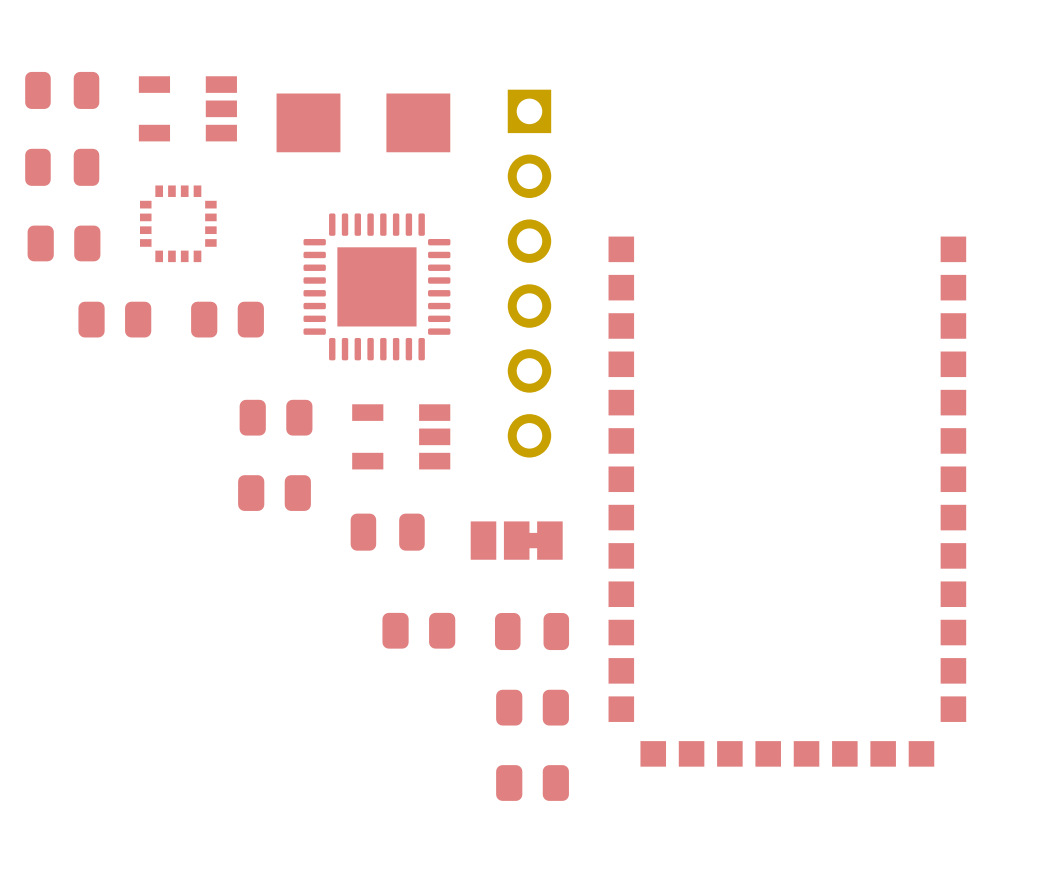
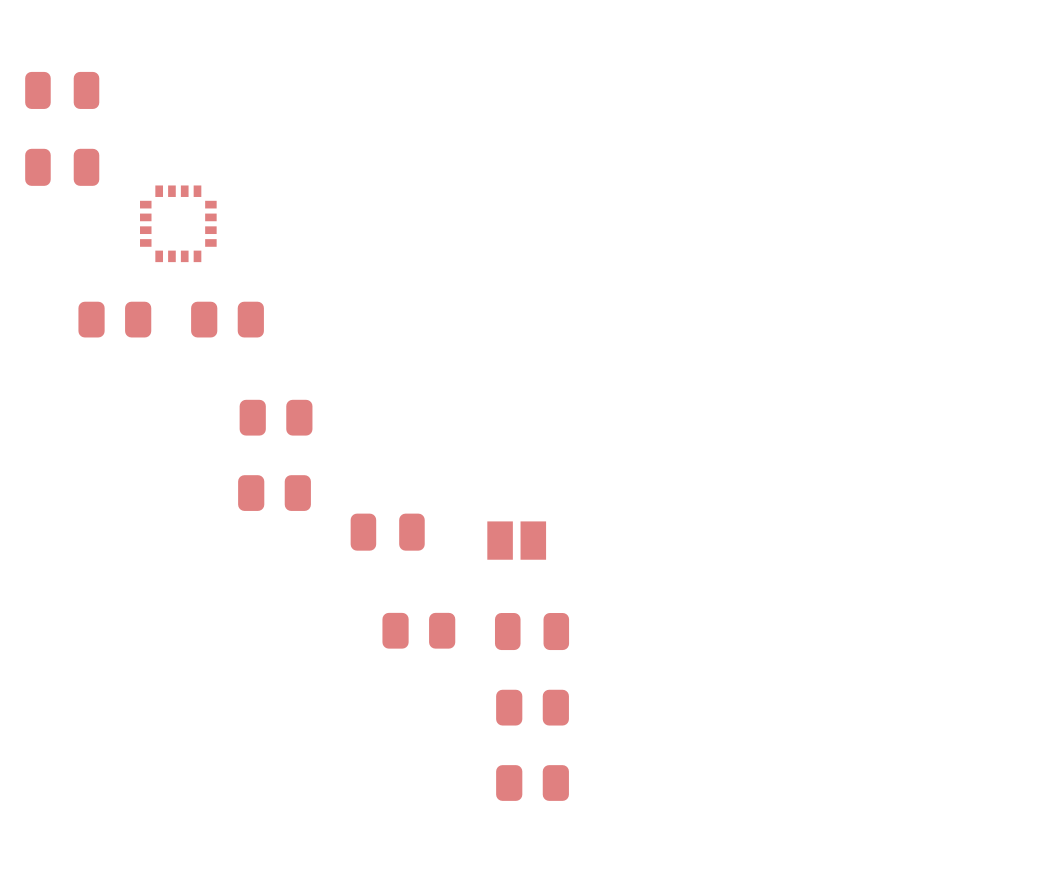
part: (187, 108) -> none
part: (363, 122) -> none
part: (64, 243) -> none
part: (529, 273) -> none
part: (376, 286) -> none
part: (401, 436) -> none
part: (787, 501) -> none
part footprint: [470, 521, 563, 560] -> [487, 521, 547, 560]

